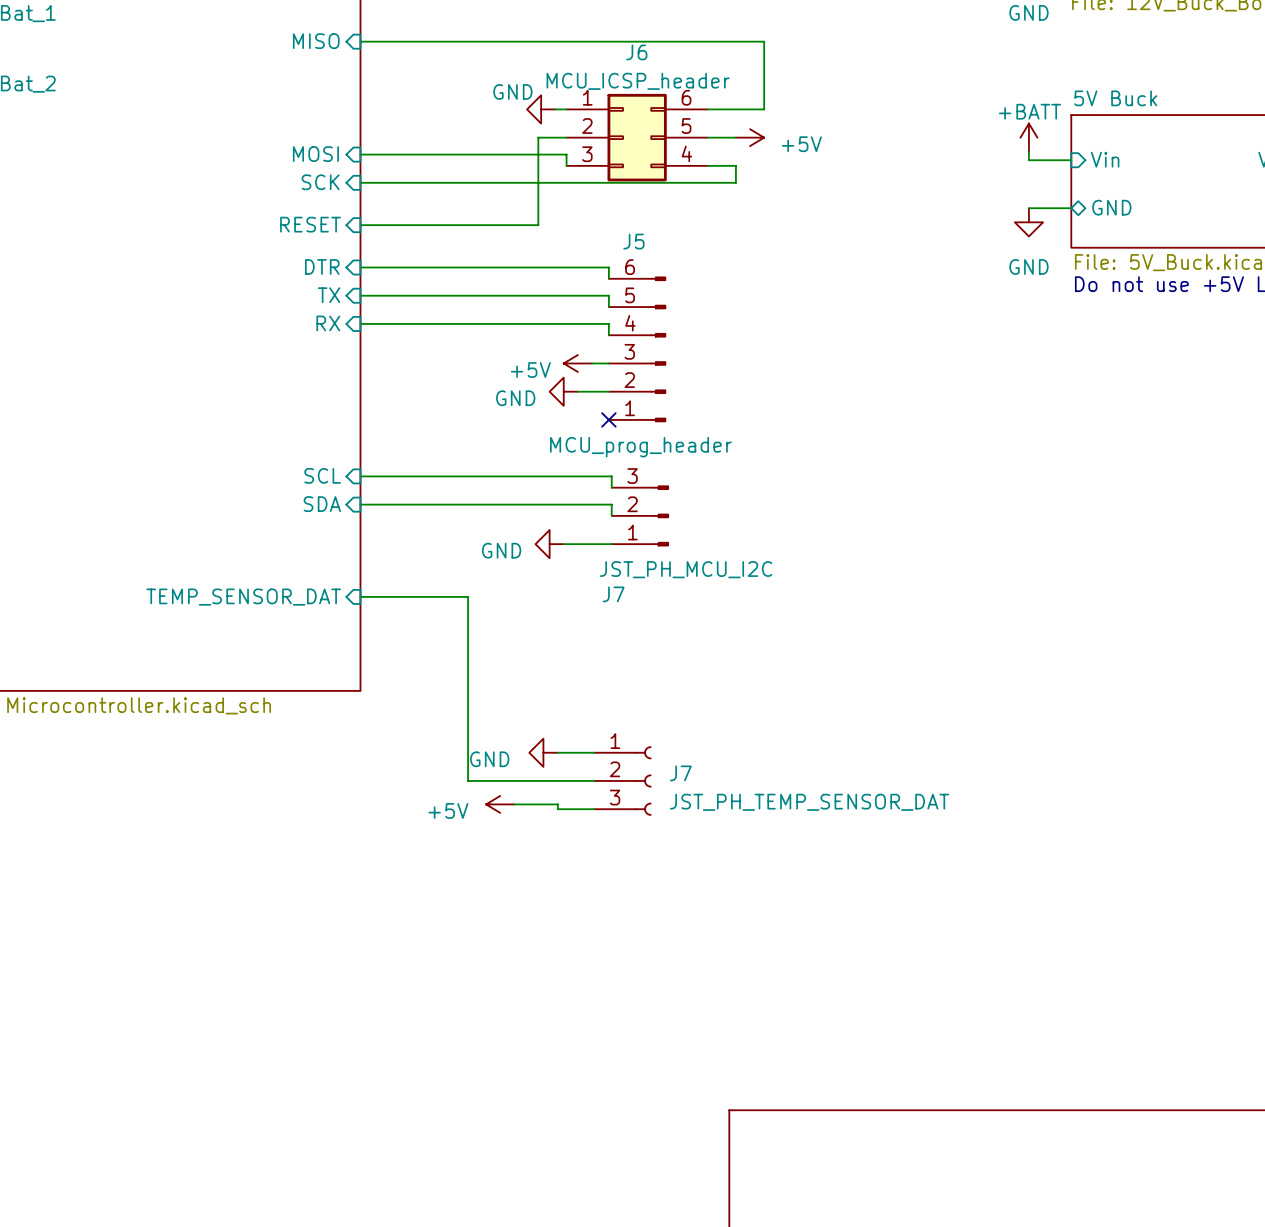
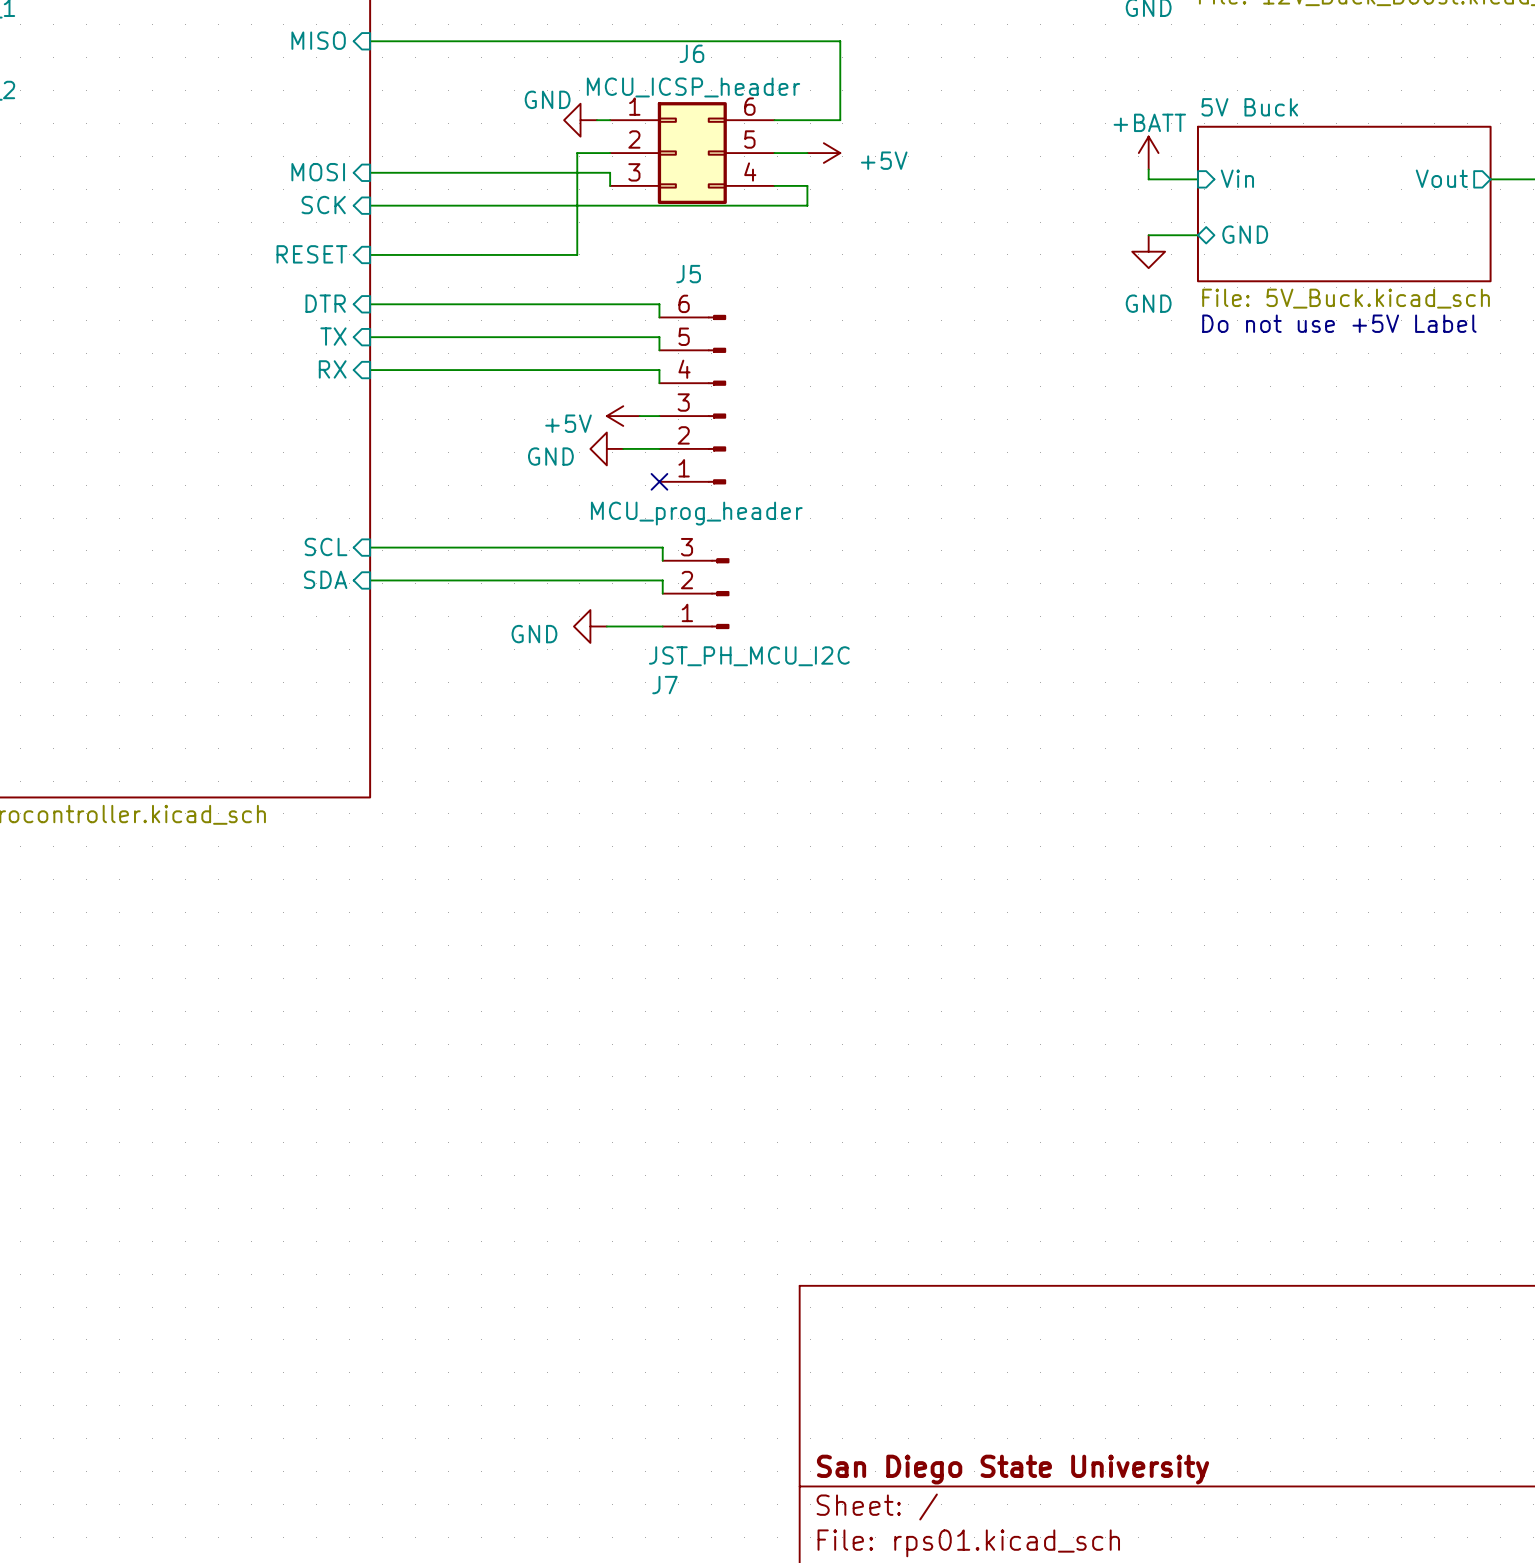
wire: (360, 596) (468, 596) (468, 780) (594, 780) -> none
sheet pin: TEMP_SENSOR_DAT (243, 597) -> none
power symbol: GND (543, 752) -> none
wire: (557, 752) (594, 752) -> none
J7: JST_PH_TEMP_SENSOR_DAT (622, 780) -> none
power symbol: +5V (500, 804) -> none
wire: (514, 804) (557, 804) (557, 809) (594, 809) -> none

